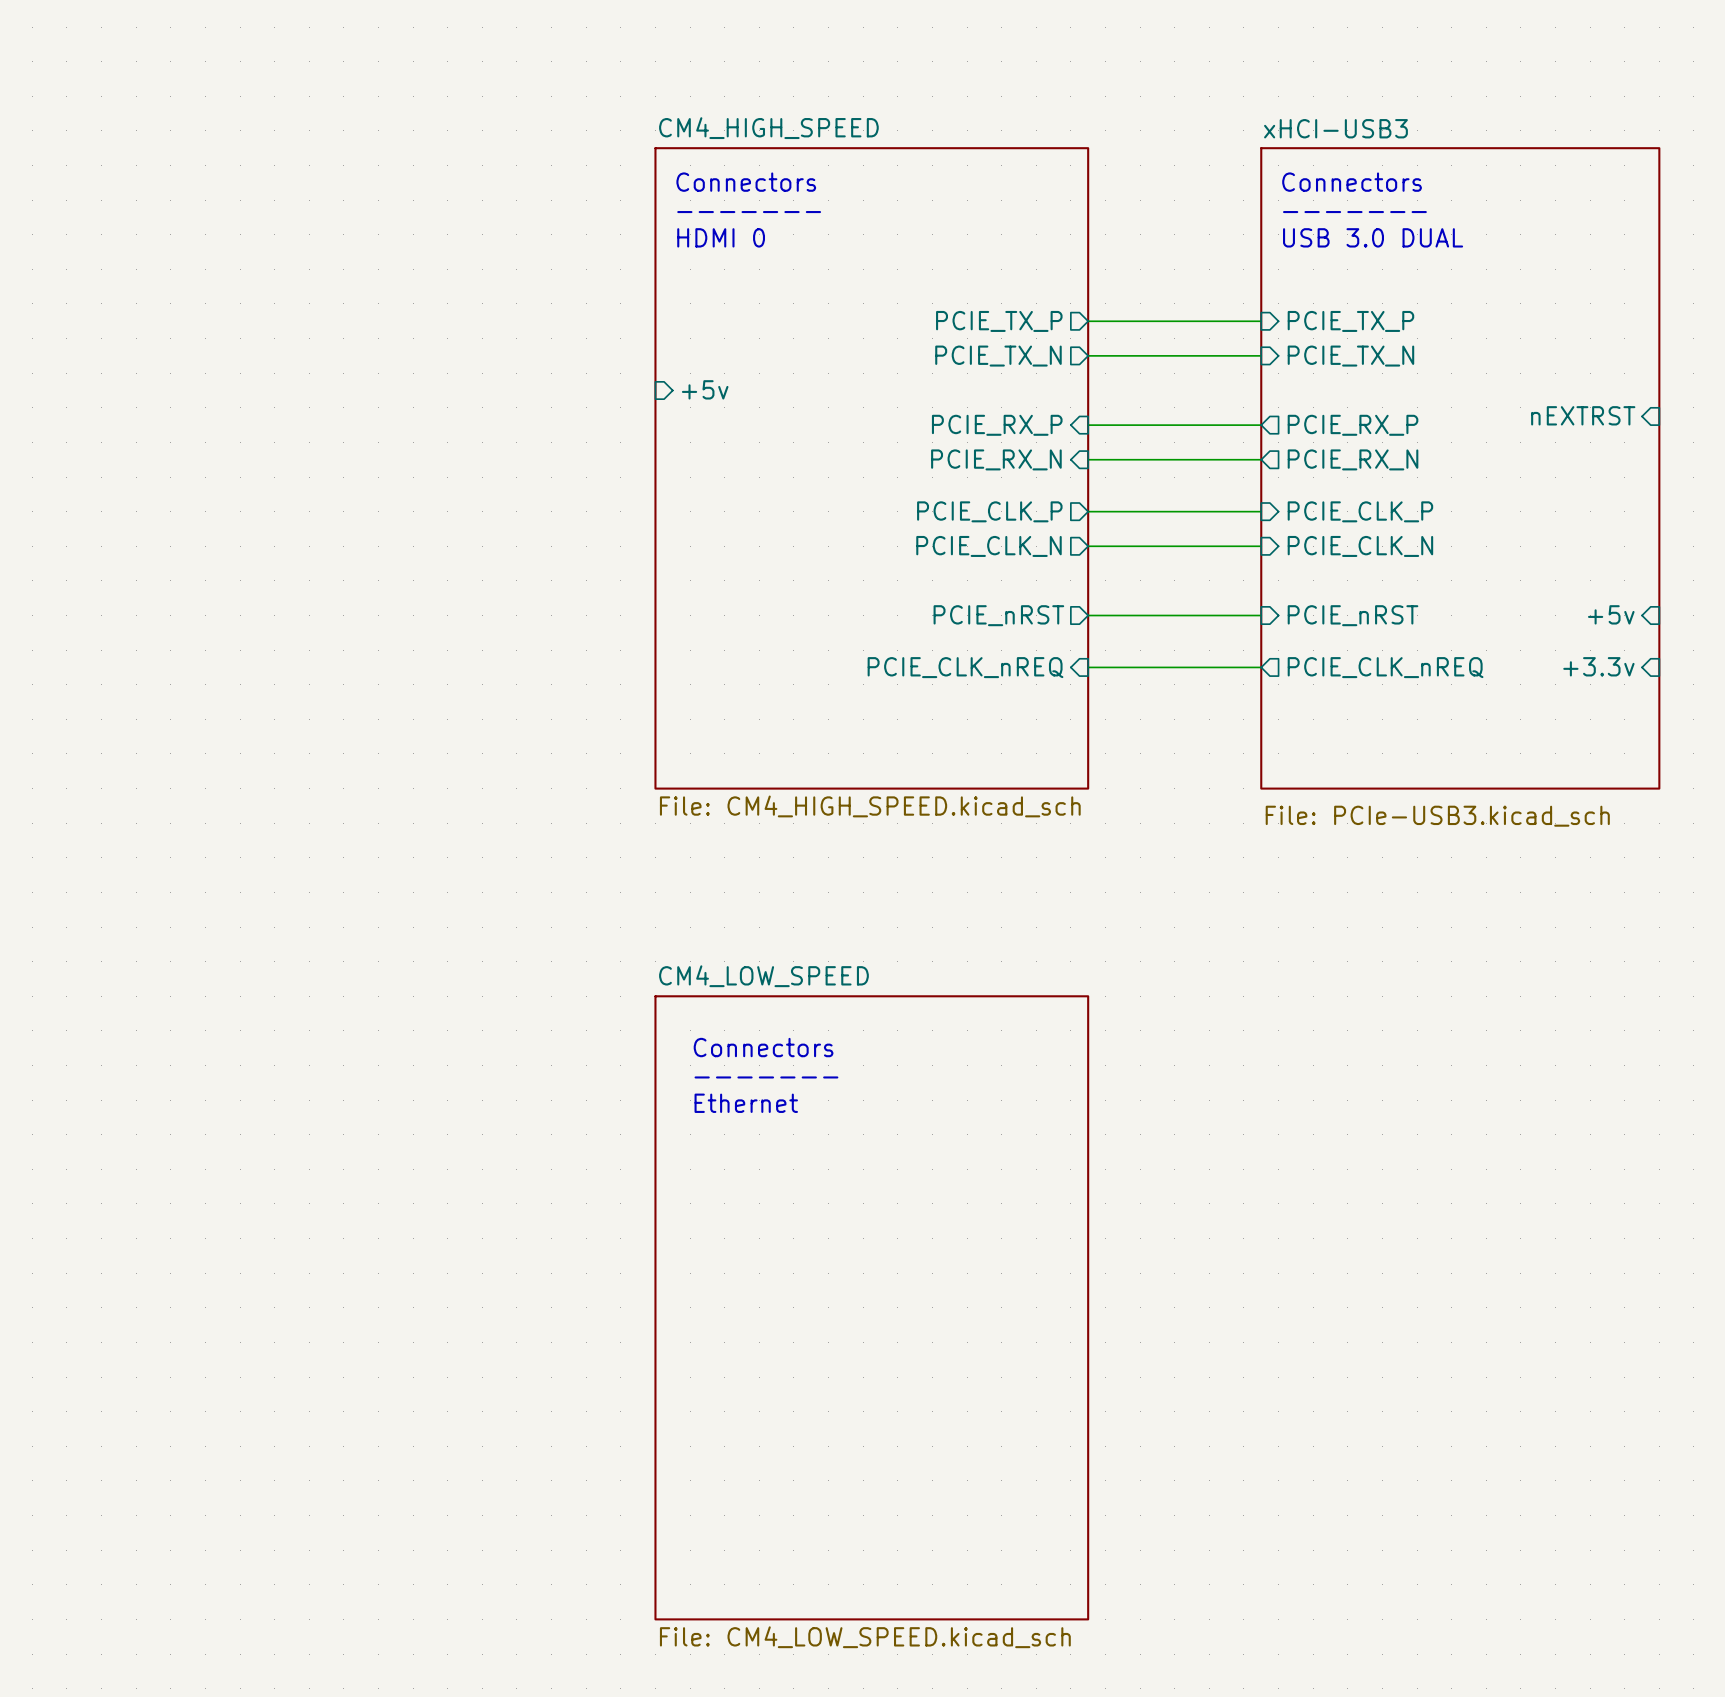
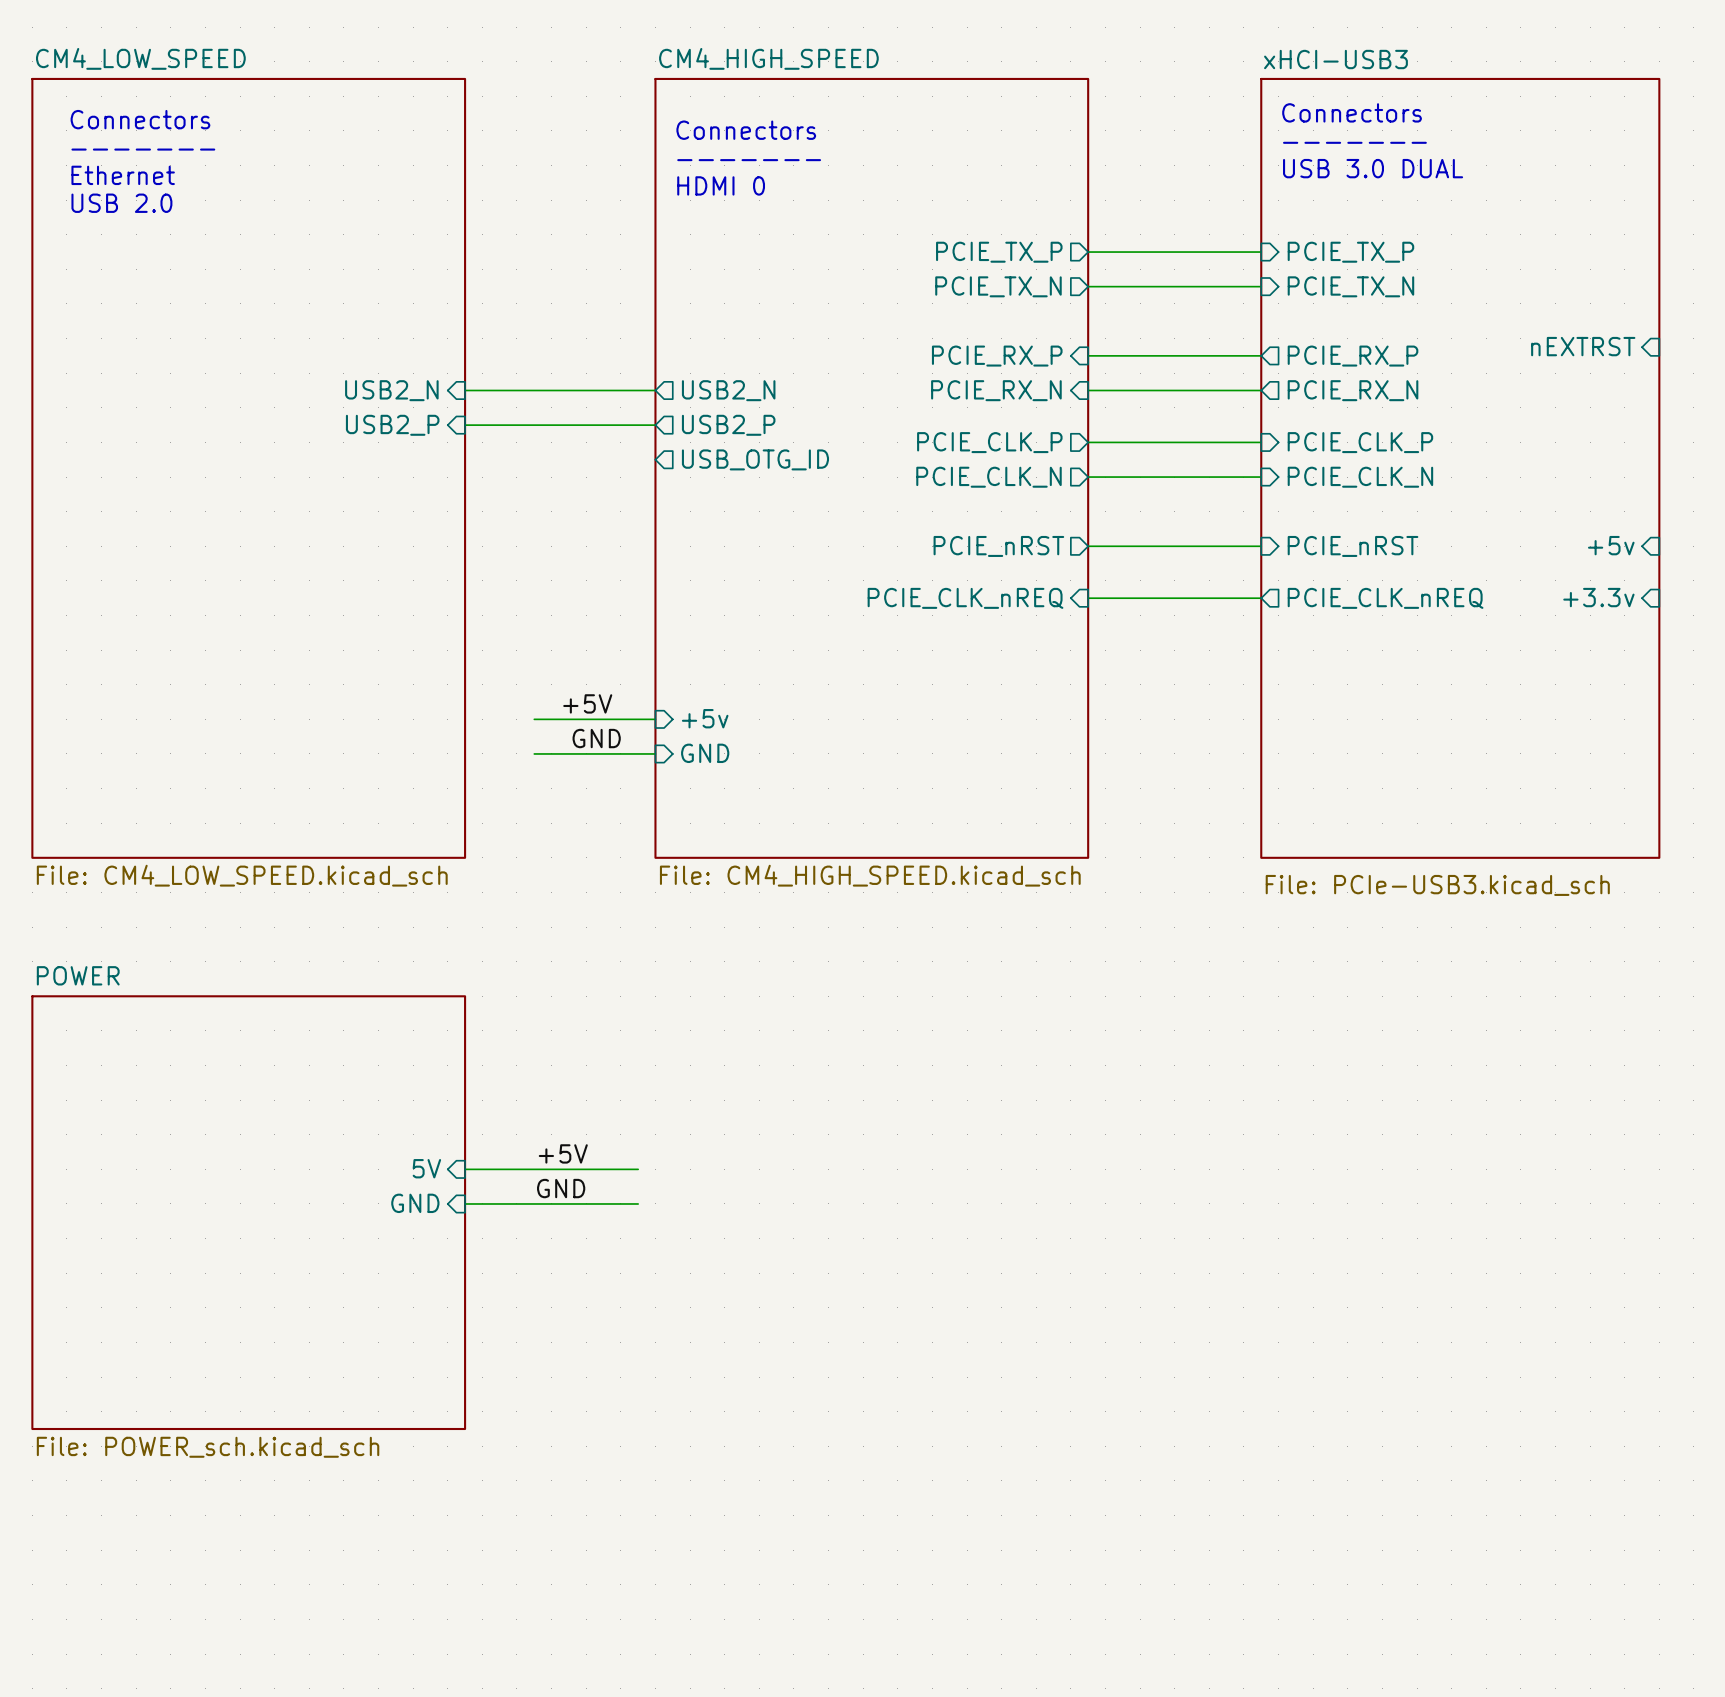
text: none -> Connectors (140, 119)
sheet CM4_HIGH_SPEED name position: CM4_HIGH_SPEED (768, 128) -> CM4_HIGH_SPEED (768, 58)
sheet xHCI-USB3 name position: xHCI-USB3 (1335, 128) -> xHCI-USB3 (1335, 59)
sheet CM4_HIGH_SPEED shape: [654, 147, 1090, 790] -> [654, 77, 1090, 859]
sheet xHCI-USB3 shape: [1260, 147, 1661, 790] -> [1260, 77, 1661, 859]
text: none -> ------- (143, 149)
text: none -> Ethernet (123, 175)
text position: Connectors (746, 182) -> Connectors (746, 130)
text position: Connectors (1352, 182) -> Connectors (1352, 112)
text: none -> USB 2.0 (121, 203)
text position: ------- (749, 212) -> ------- (749, 160)
text position: ------- (1354, 212) -> ------- (1354, 142)
text position: HDMI 0 (721, 237) -> HDMI 0 (721, 185)
text position: USB 3.0 DUAL (1373, 237) -> USB 3.0 DUAL (1373, 168)
sheet pin: none -> PCIE_TX_N (998, 286)
sheet pin: none -> PCIE_TX_N (1350, 286)
sheet pin position: PCIE_TX_P (999, 321) -> PCIE_TX_P (999, 252)
wire: (1088, 321) (1261, 321) -> (1088, 252) (1261, 252)
sheet pin position: PCIE_TX_P (1350, 321) -> PCIE_TX_P (1350, 252)
sheet pin shape: output (998, 356) -> input (997, 356)
sheet pin: PCIE_TX_N (998, 356) -> PCIE_RX_P (997, 356)
sheet pin shape: input (1350, 356) -> output (1353, 356)
sheet pin: PCIE_TX_N (1350, 356) -> PCIE_RX_P (1353, 356)
sheet pin shape: input (705, 389) -> output (728, 390)
sheet pin: +5v (705, 389) -> USB2_N (728, 390)
sheet pin: none -> USB2_N (391, 390)
wire: none -> (465, 390) (655, 390)
sheet pin position: nEXTRST (1583, 415) -> nEXTRST (1583, 346)
sheet pin: none -> USB2_P (392, 425)
wire: none -> (465, 425) (655, 425)
sheet pin: none -> USB2_P (728, 425)
sheet pin: PCIE_RX_P (997, 425) -> none
wire: (1088, 425) (1261, 425) -> (1088, 286) (1261, 286)
sheet pin: PCIE_RX_P (1353, 425) -> none
sheet pin: none -> USB_OTG_ID (755, 459)
sheet pin position: PCIE_RX_N (996, 459) -> PCIE_RX_N (996, 390)
wire: (1088, 459) (1261, 459) -> (1088, 390) (1261, 390)
sheet pin position: PCIE_RX_N (1353, 459) -> PCIE_RX_N (1353, 390)
sheet pin: none -> PCIE_CLK_N (988, 477)
sheet pin: none -> PCIE_CLK_N (1360, 477)
sheet pin position: PCIE_CLK_P (989, 511) -> PCIE_CLK_P (989, 442)
wire: (1088, 511) (1261, 511) -> (1088, 442) (1261, 442)
sheet pin position: PCIE_CLK_P (1360, 511) -> PCIE_CLK_P (1360, 442)
sheet pin: PCIE_CLK_N (988, 546) -> PCIE_nRST (998, 546)
sheet pin: PCIE_CLK_N (1360, 546) -> PCIE_nRST (1353, 546)
sheet pin position: +5v (1611, 614) -> +5v (1611, 545)
sheet pin: PCIE_nRST (998, 615) -> none
wire: (1088, 615) (1261, 615) -> (1088, 477) (1261, 477)
sheet pin: PCIE_nRST (1353, 615) -> none
sheet pin position: +3.3v (1598, 666) -> +3.3v (1598, 597)
sheet pin position: PCIE_CLK_nREQ (965, 667) -> PCIE_CLK_nREQ (965, 598)
wire: (1088, 667) (1261, 667) -> (1088, 598) (1261, 598)
sheet pin position: PCIE_CLK_nREQ (1385, 667) -> PCIE_CLK_nREQ (1385, 598)
label: none -> +5V (587, 703)
sheet pin: none -> +5v (705, 718)
wire: none -> (534, 719) (655, 719)
label: none -> GND (596, 738)
wire: none -> (534, 753) (655, 753)
sheet pin: none -> GND (705, 753)
sheet CM4_HIGH_SPEED value position: File: CM4_HIGH_SPEED.kicad_sch (870, 806) -> File: CM4_HIGH_SPEED.kicad_sch (870, 875)
sheet xHCI-USB3 value position: File: PCIe-USB3.kicad_sch (1437, 816) -> File: PCIe-USB3.kicad_sch (1437, 885)
sheet CM4_LOW_SPEED name position: CM4_LOW_SPEED (763, 976) -> CM4_LOW_SPEED (140, 58)
sheet CM4_LOW_SPEED shape: [654, 995, 1090, 1621] -> [31, 77, 467, 859]
text: Connectors (763, 1047) -> none
text: ------- (766, 1077) -> none
text: Ethernet (746, 1103) -> none
label: none -> +5V (563, 1153)
sheet pin: none -> 5V (426, 1168)
wire: none -> (465, 1169) (638, 1169)
label: none -> GND (561, 1188)
sheet pin: none -> GND (415, 1203)
wire: none -> (465, 1203) (638, 1203)
sheet POWER: none -> File: POWER_sch.kicad_sch (248, 1212)
sheet CM4_LOW_SPEED value position: File: CM4_LOW_SPEED.kicad_sch (865, 1637) -> File: CM4_LOW_SPEED.kicad_sch (242, 875)

